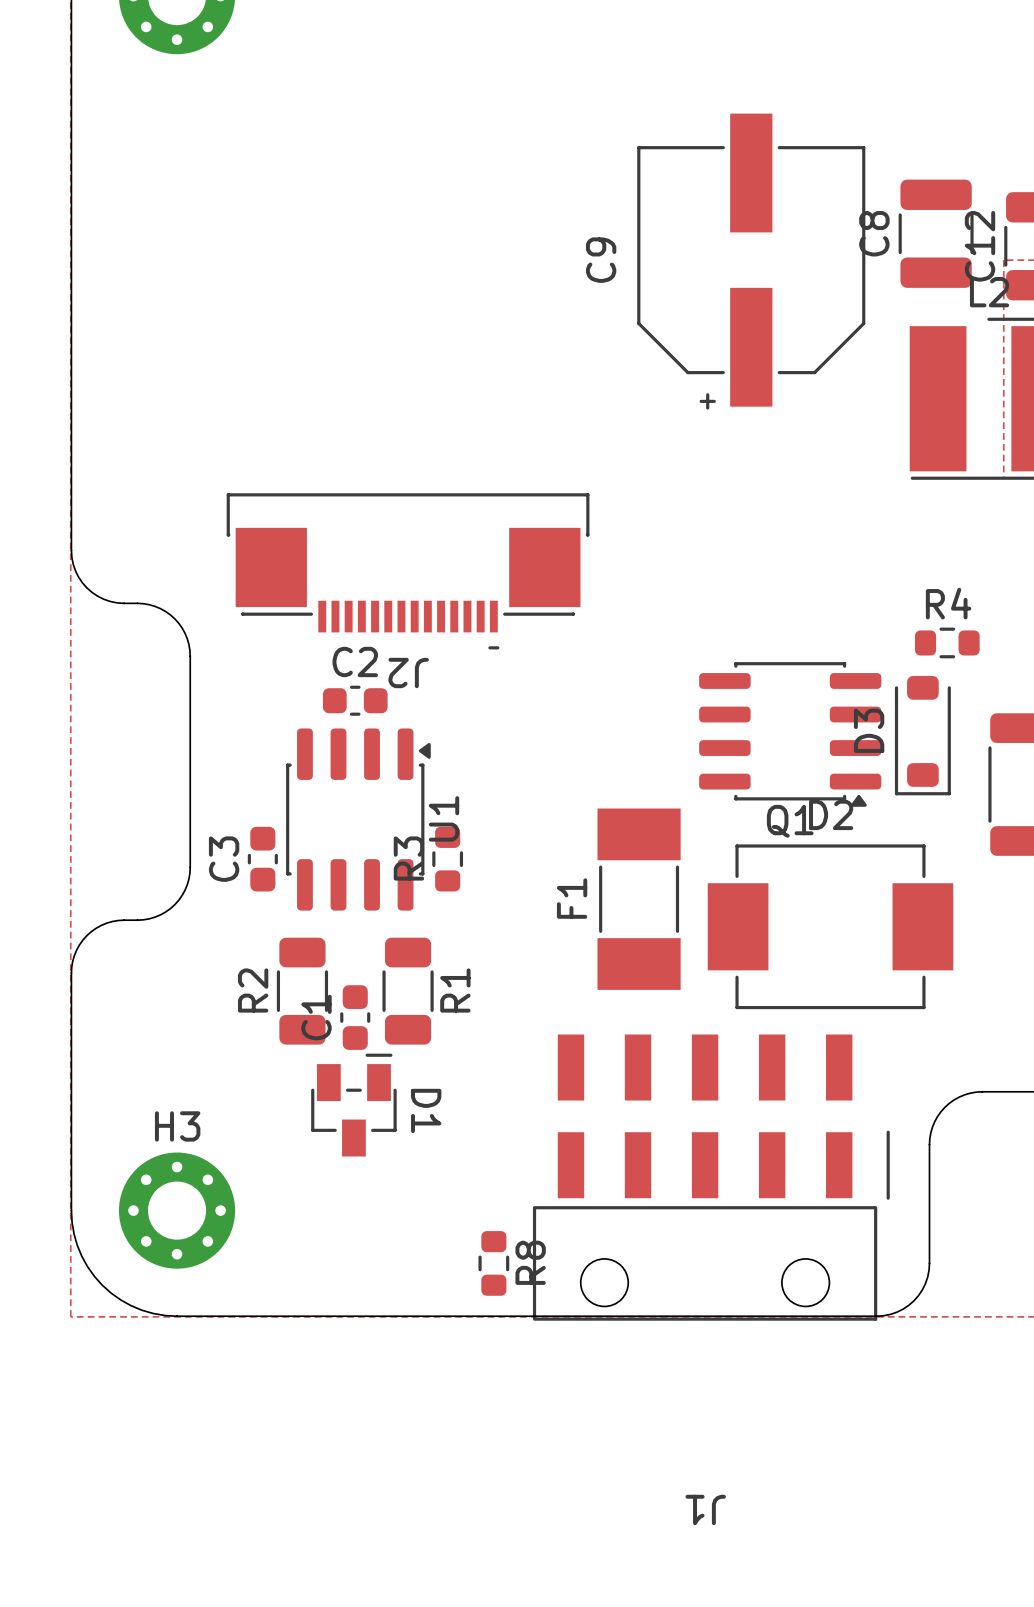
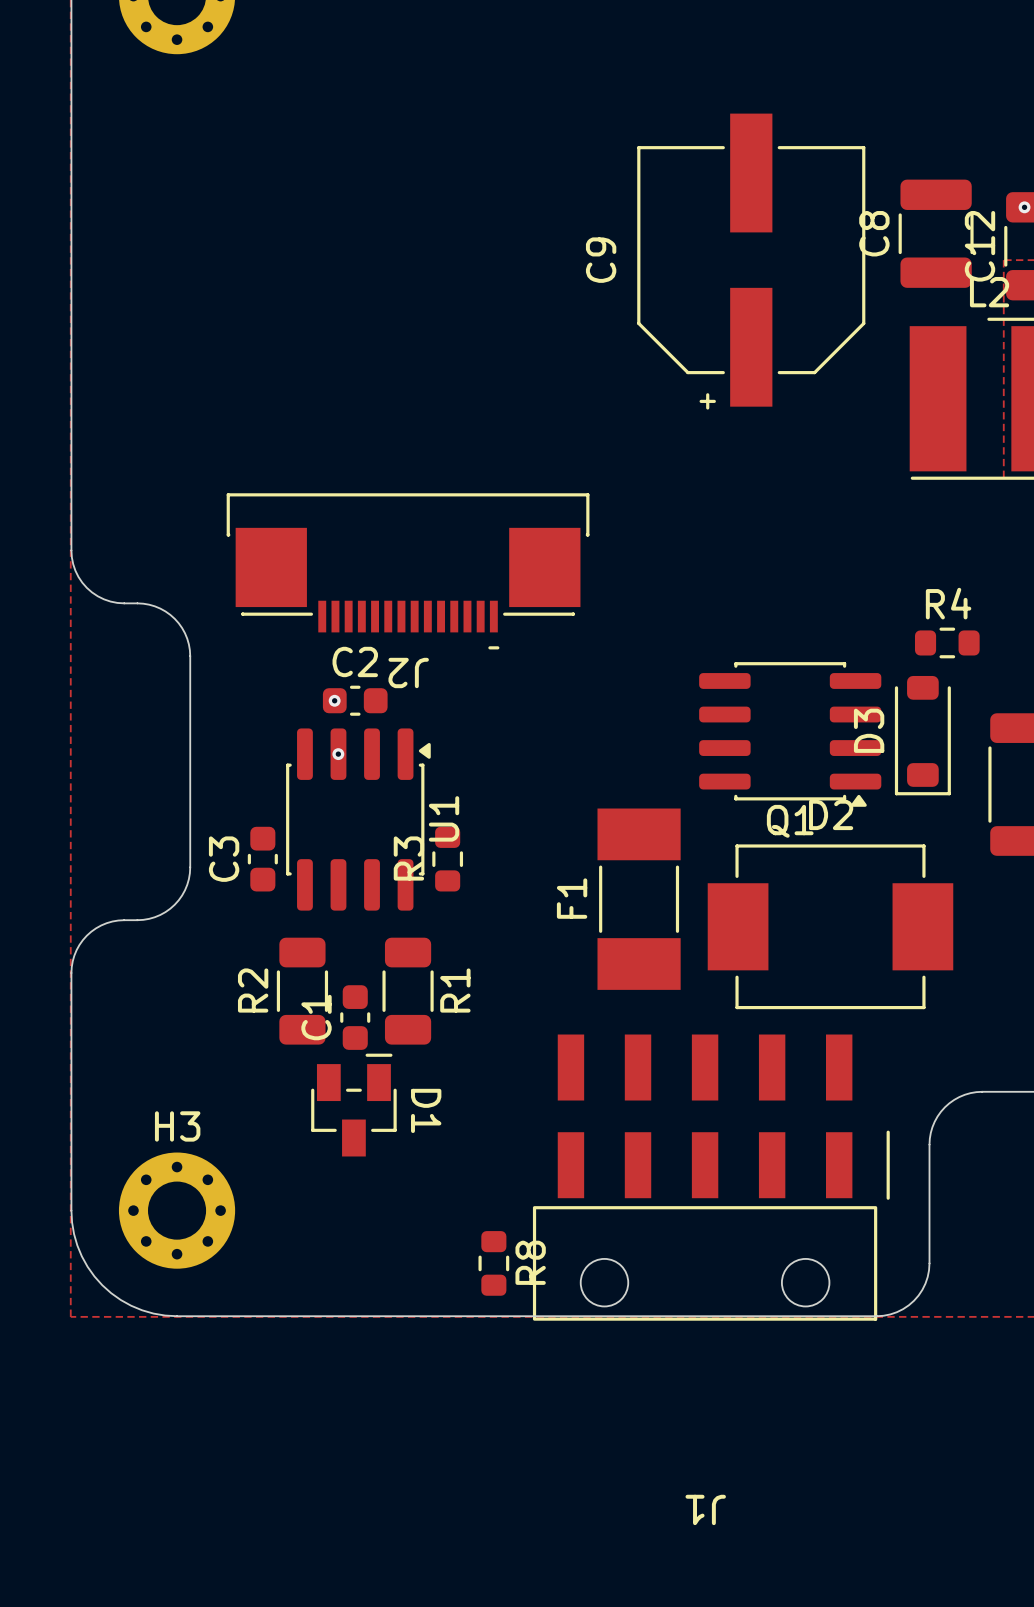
via: none -> (1024, 207)
via: none -> (334, 700)
via: none -> (338, 754)

